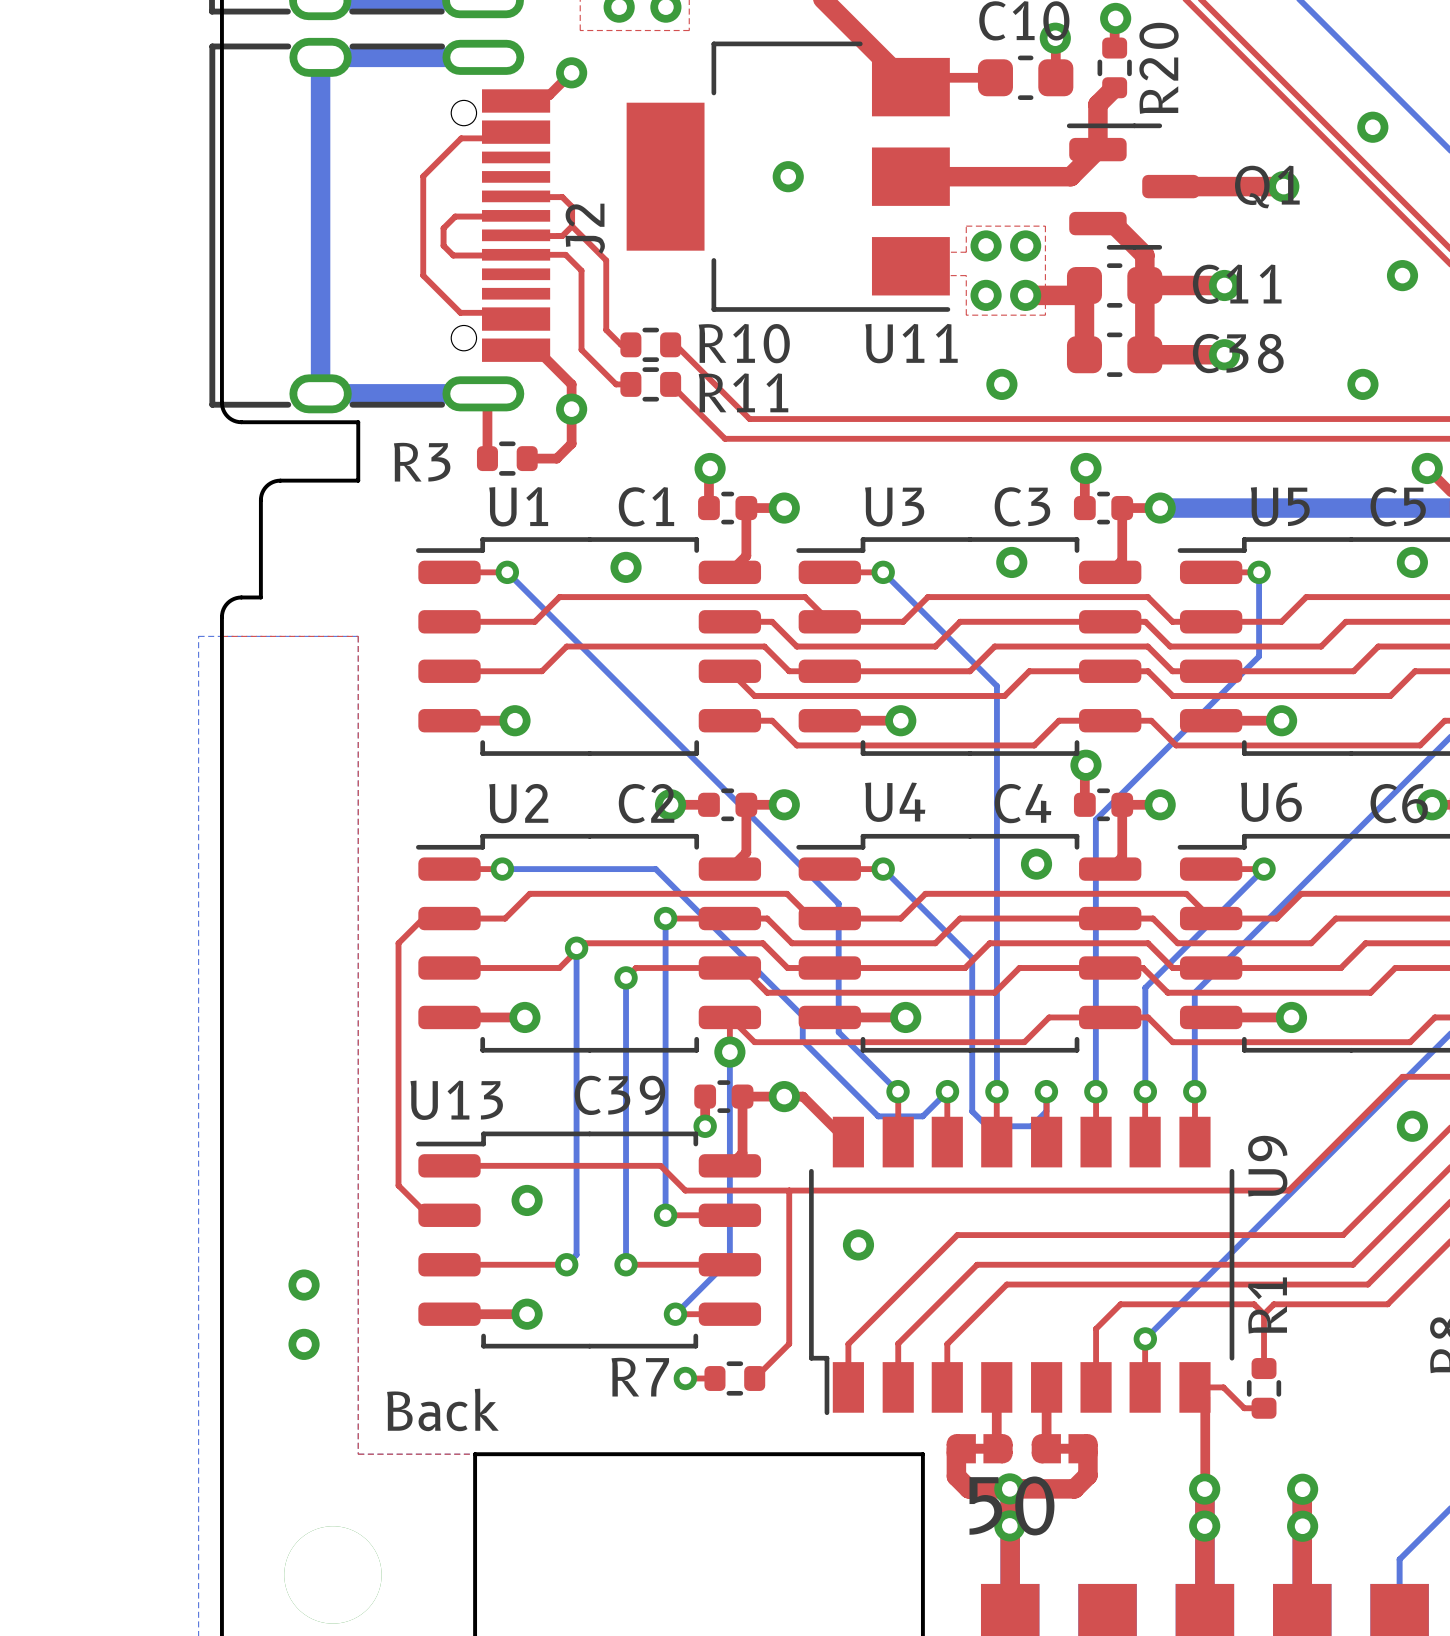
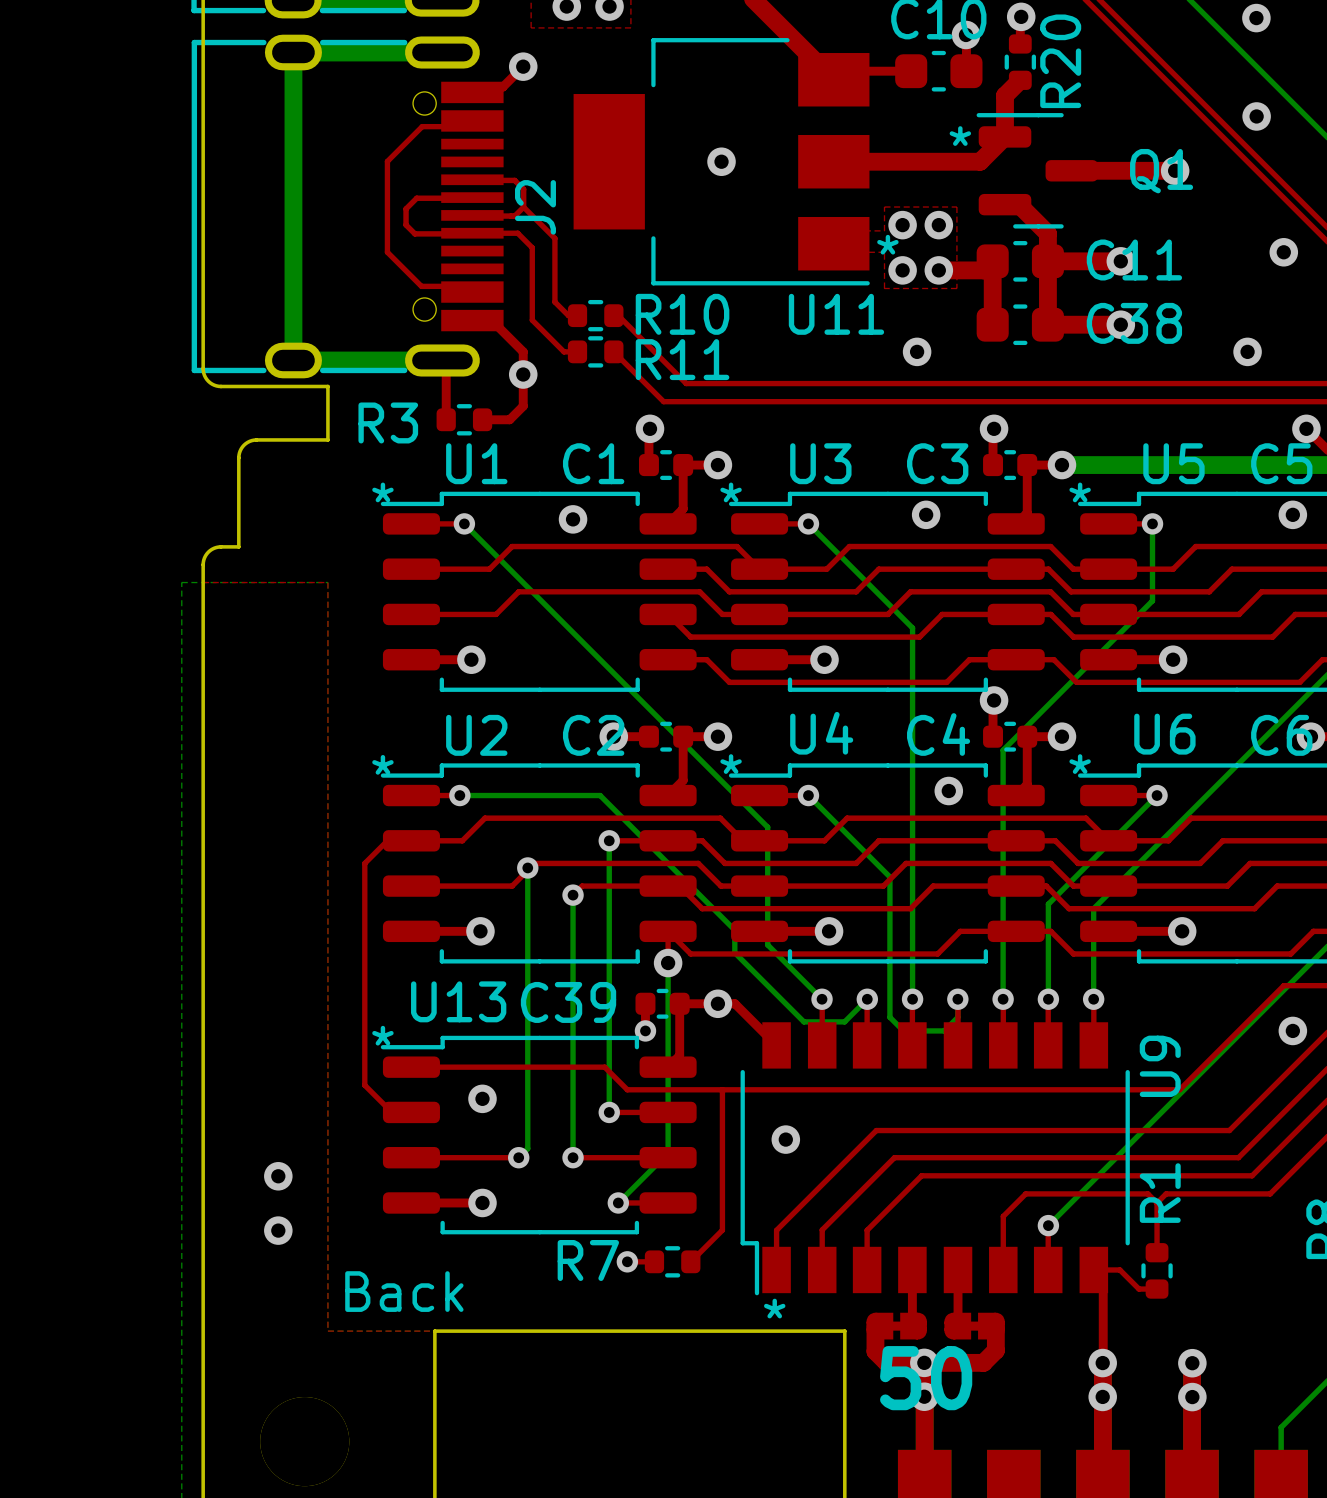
via: none -> (1256, 18)
text: none -> * (960, 136)
text: none -> * (887, 244)
text: none -> * (382, 492)
text: none -> * (731, 492)
text: none -> * (1080, 492)
text: none -> * (731, 764)
text: none -> * (1080, 764)
text: none -> * (382, 764)
U13 name position: U13 (456, 1100) -> U13 (458, 1001)
text: none -> * (382, 1035)
text: none -> * (774, 1308)

